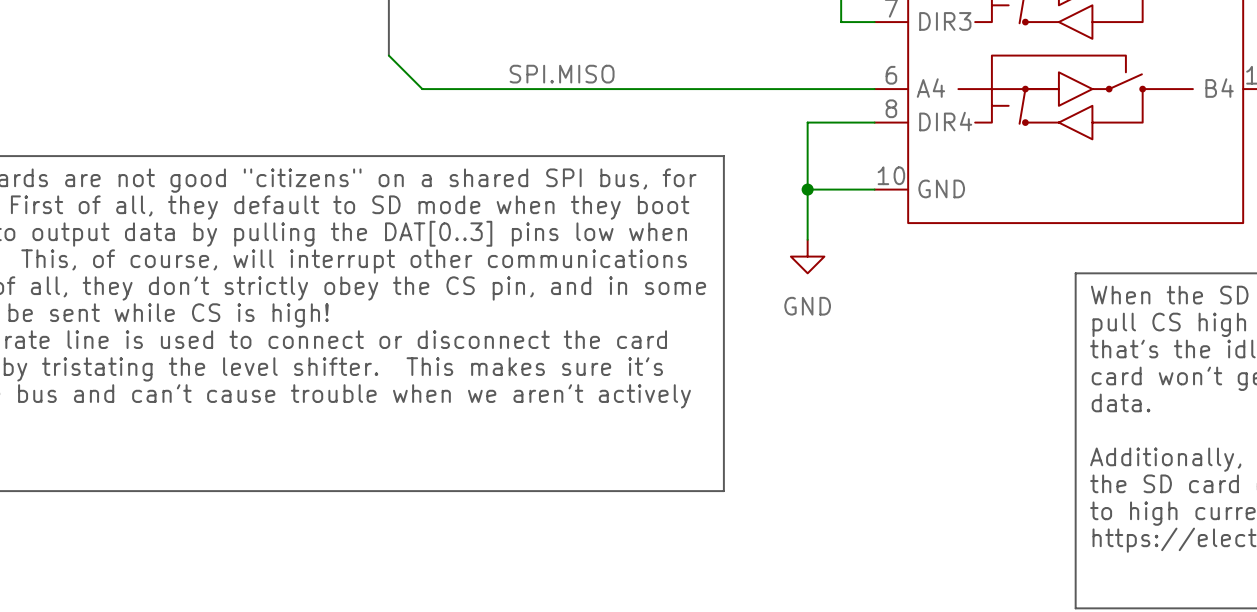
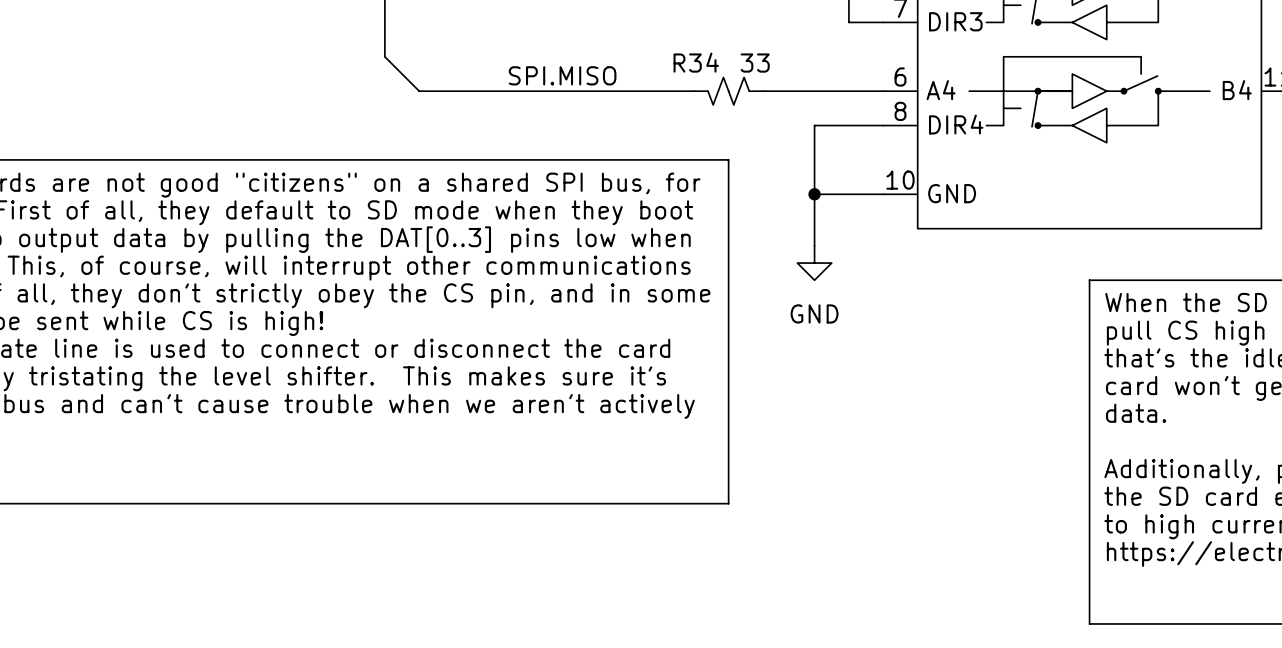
R34: none -> 33 (728, 91)

